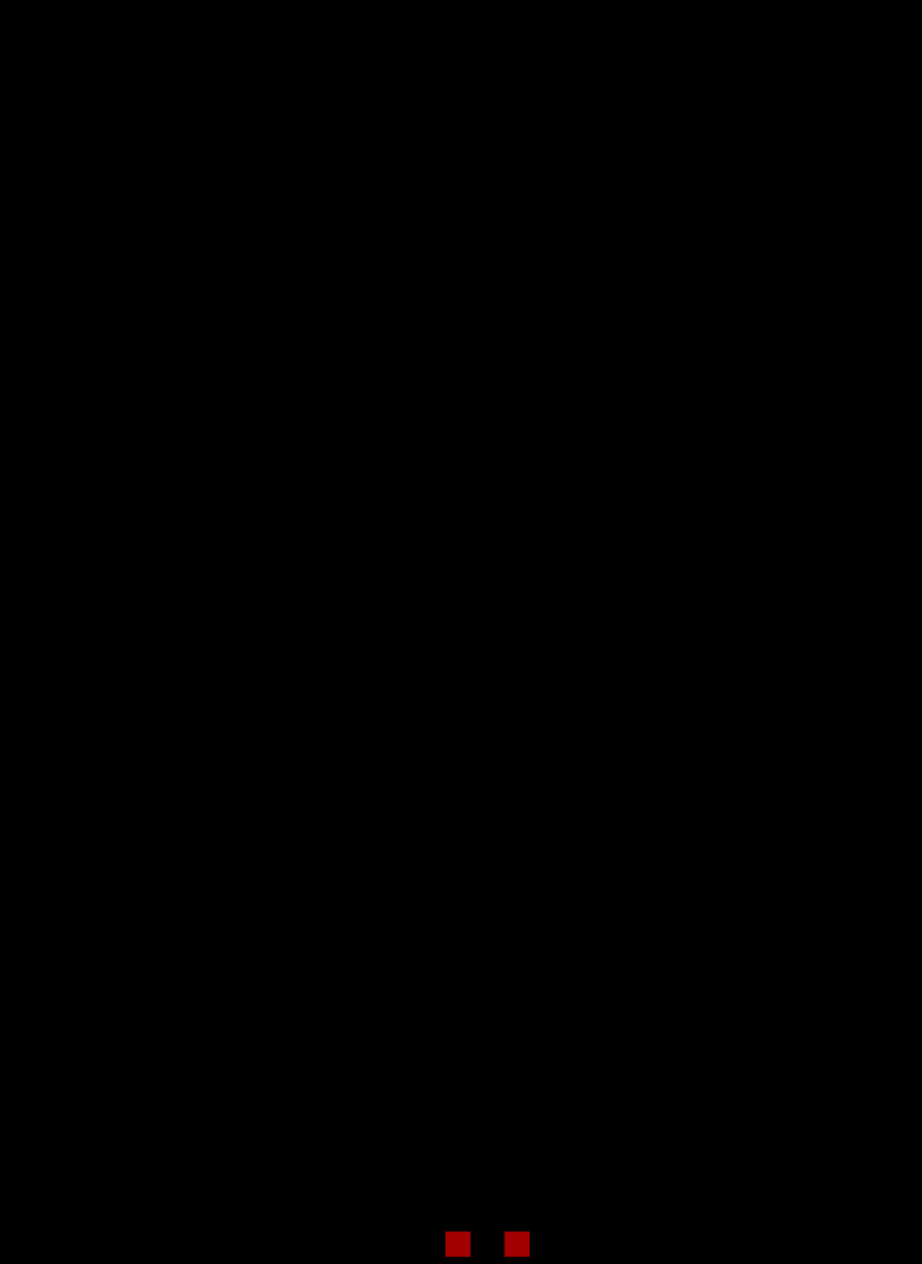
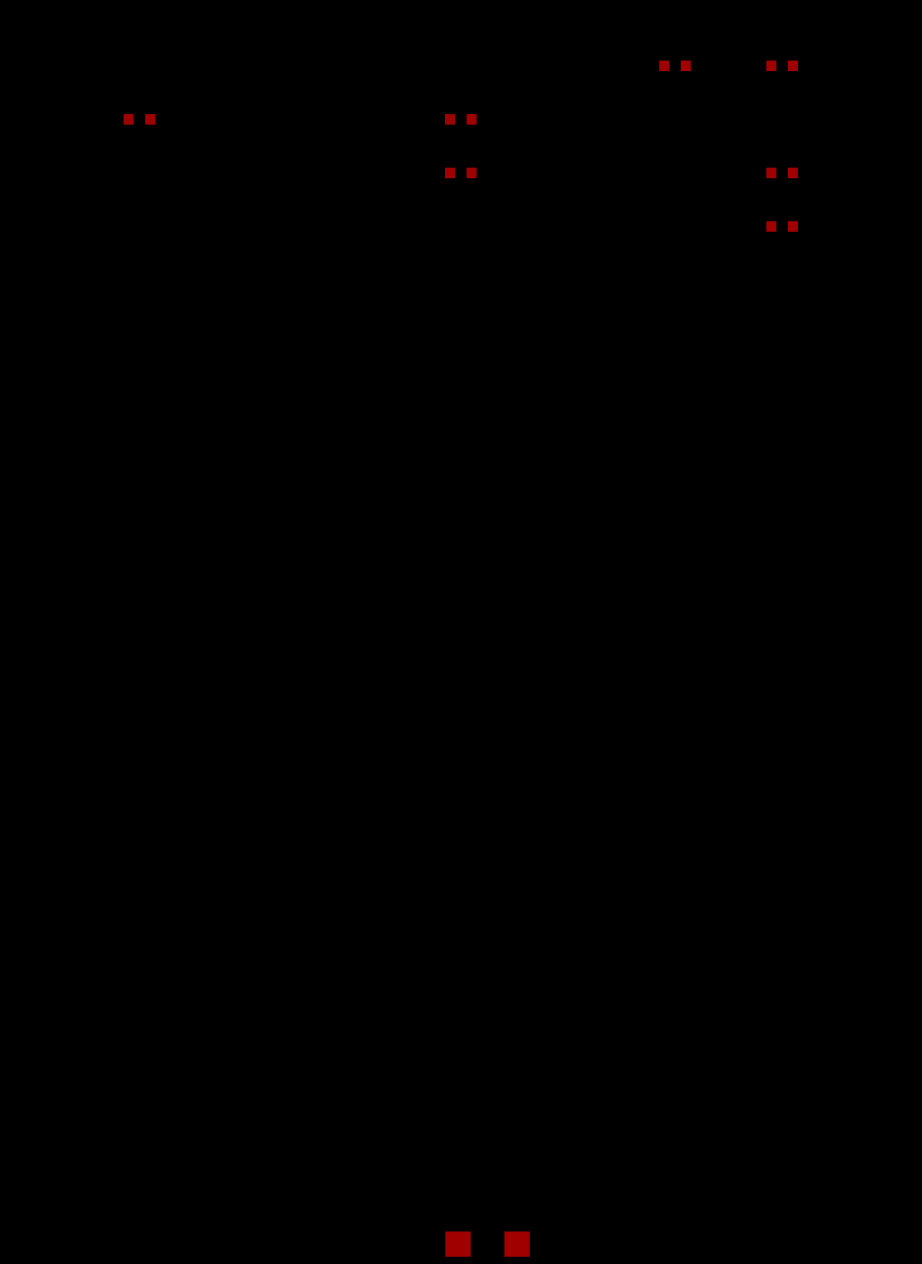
part: none -> (675, 65)
part: none -> (782, 65)
part: none -> (139, 119)
part: none -> (460, 119)
part: none -> (460, 172)
part: none -> (782, 172)
part: none -> (782, 226)

